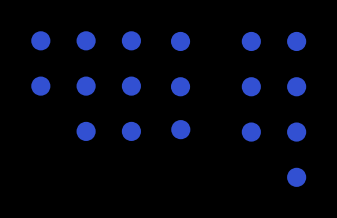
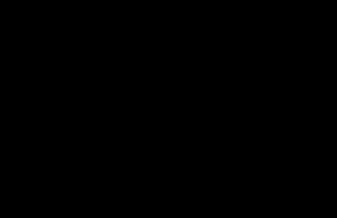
part: (40, 40) -> none
part: (86, 40) -> none
part: (131, 40) -> none
part: (180, 41) -> none
part: (251, 41) -> none
part: (296, 41) -> none
part: (40, 86) -> none
part: (86, 86) -> none
part: (131, 86) -> none
part: (180, 86) -> none
part: (251, 86) -> none
part: (296, 86) -> none
part: (180, 129) -> none
part: (86, 131) -> none
part: (131, 131) -> none
part: (251, 132) -> none
part: (296, 132) -> none
part: (296, 177) -> none

